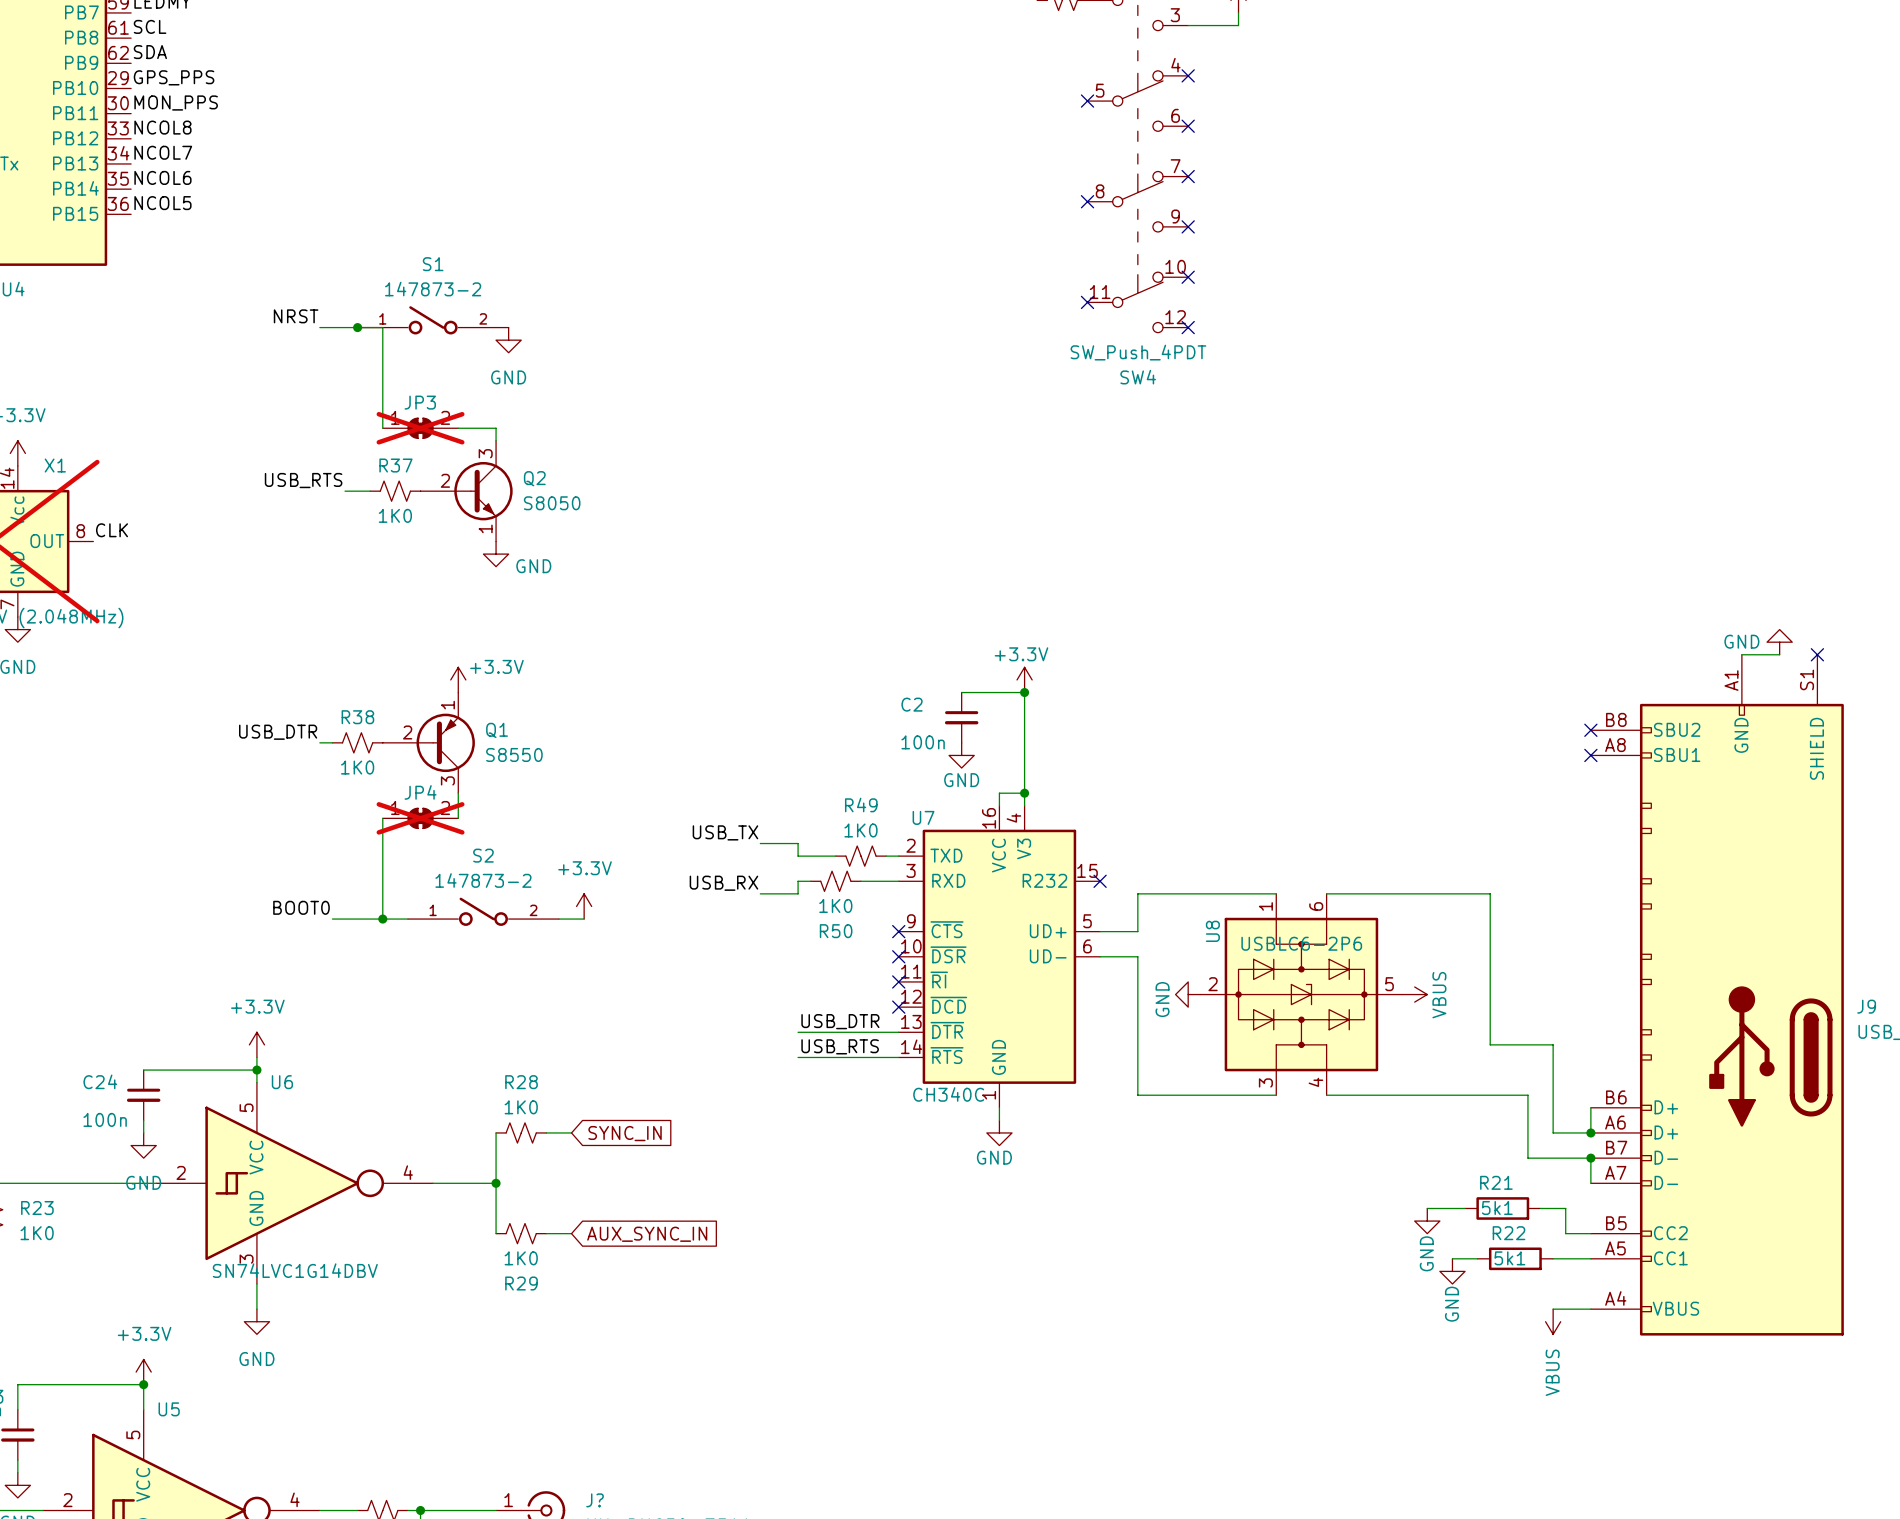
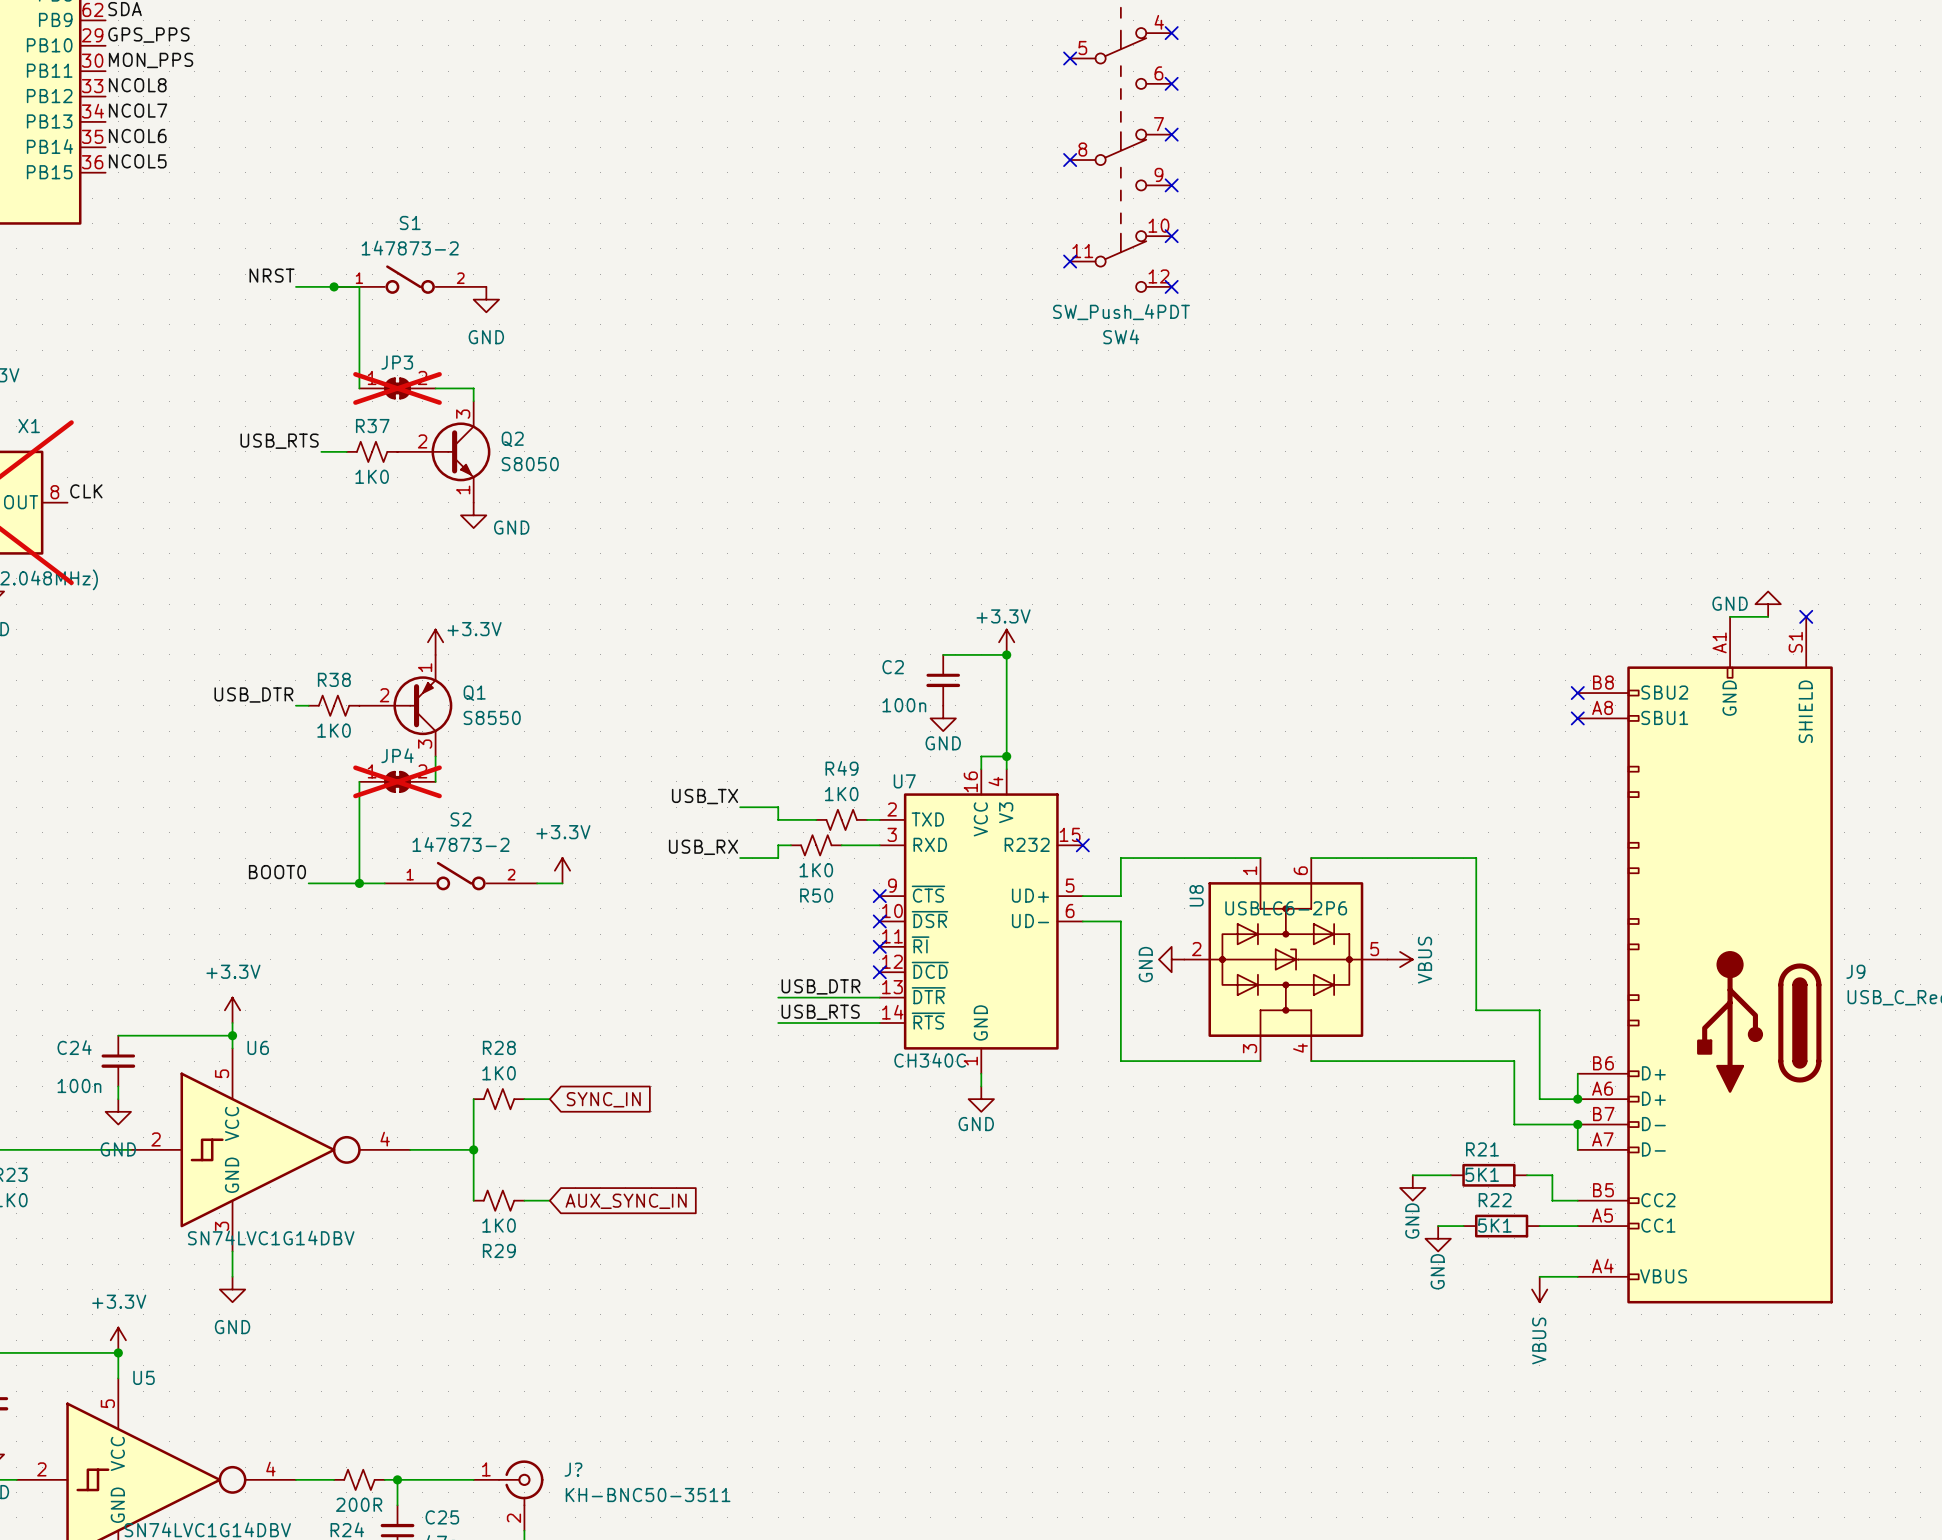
R21 value: 5k1 (1497, 1208) -> 5K1 (1482, 1174)
R22 value: 5k1 (1509, 1258) -> 5K1 (1494, 1225)

